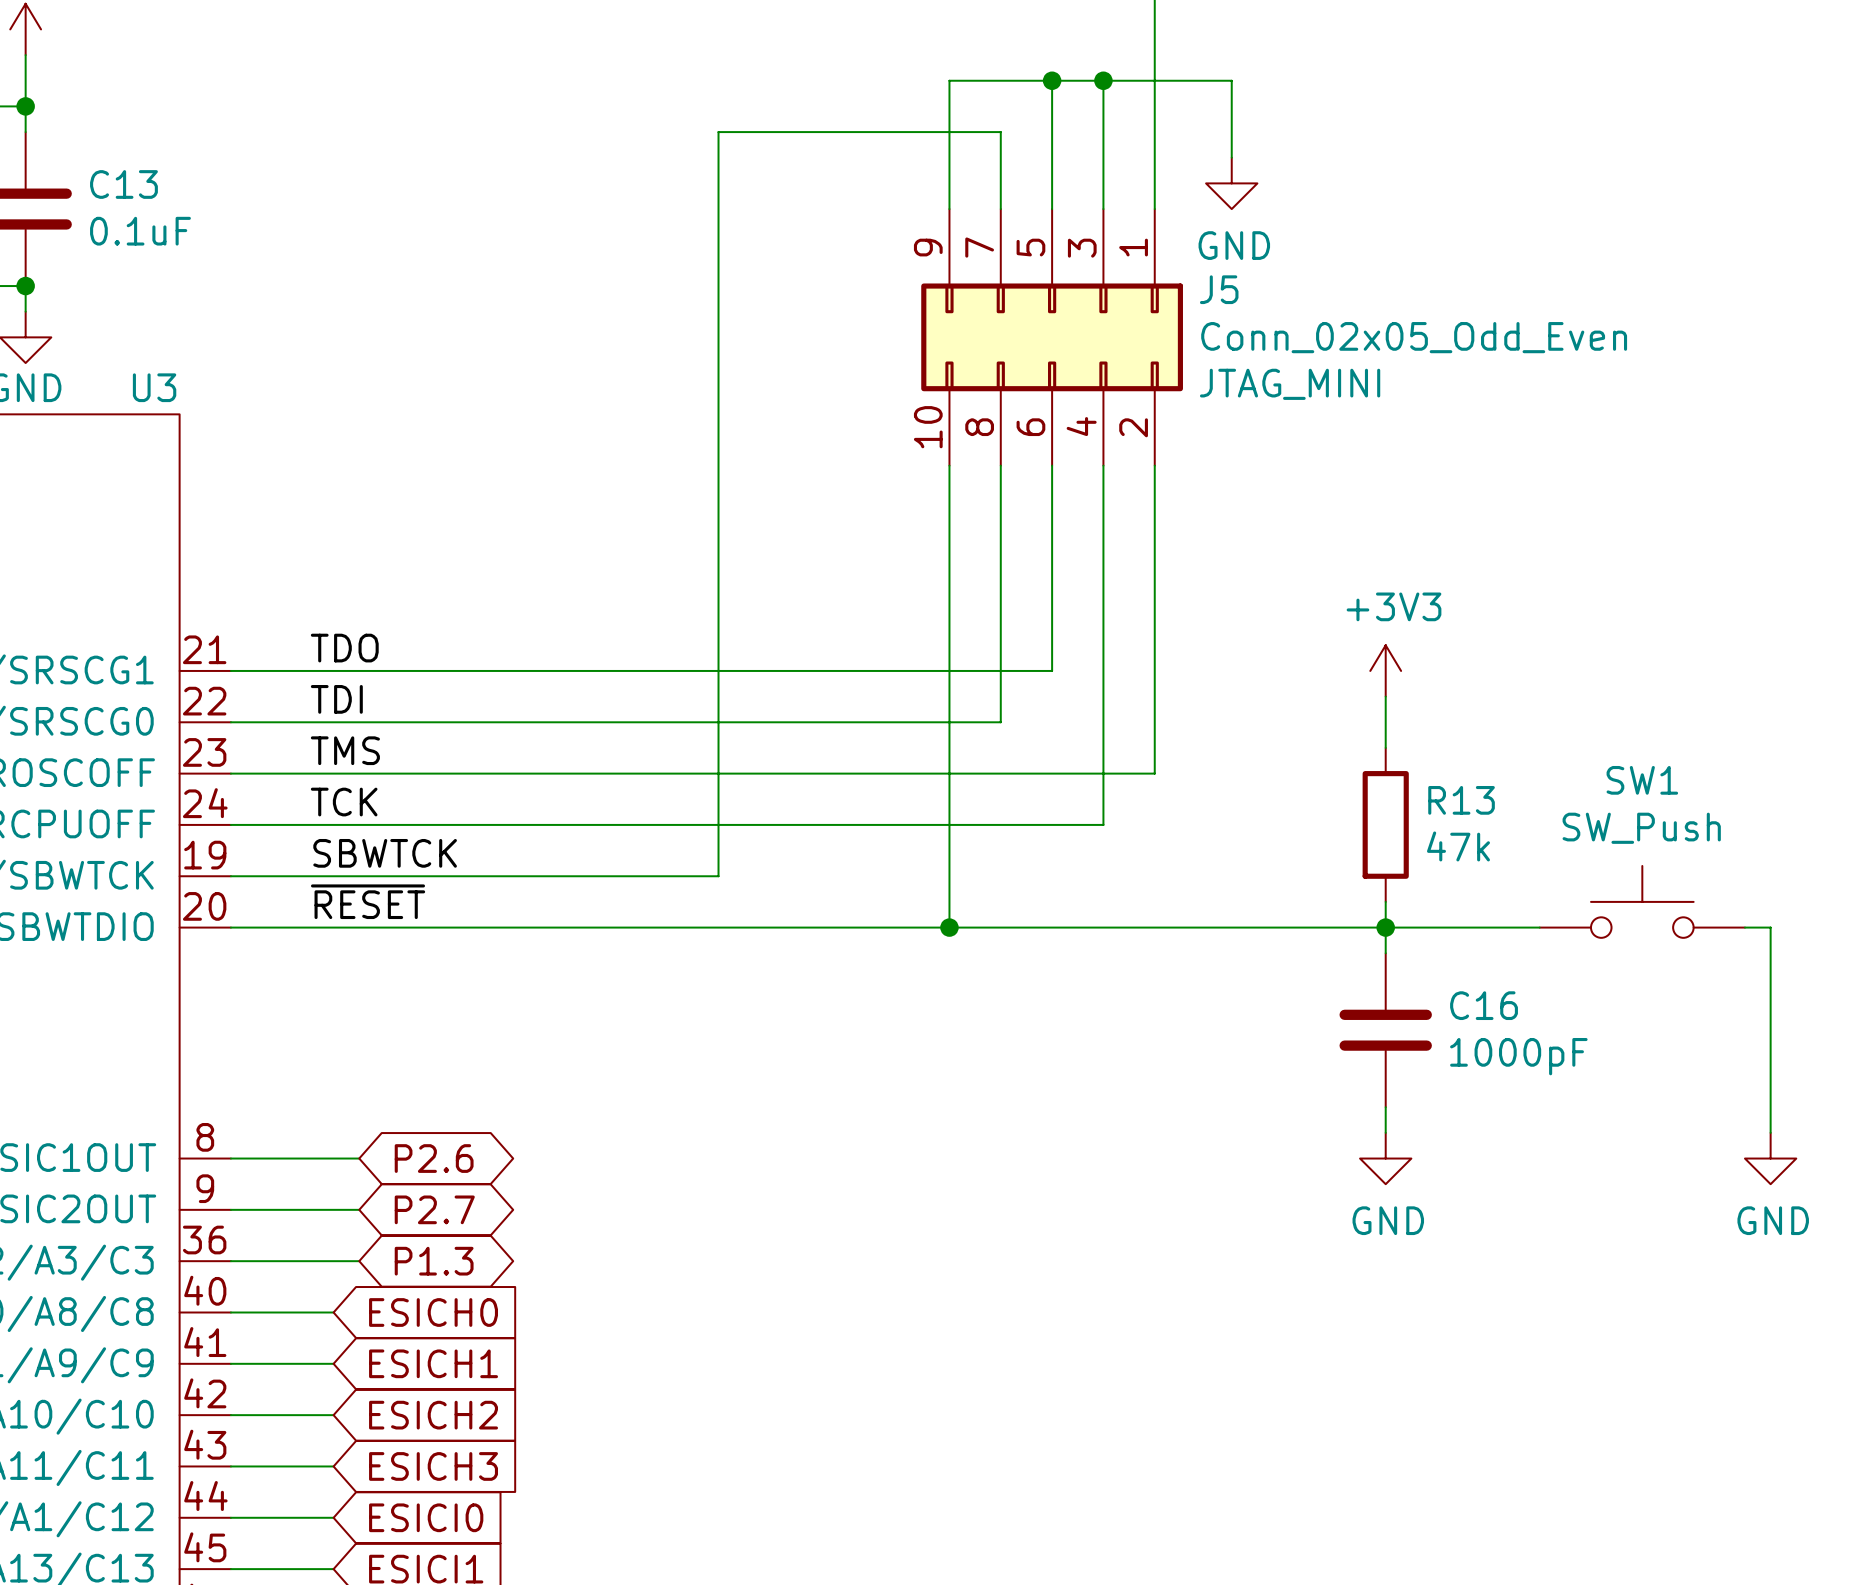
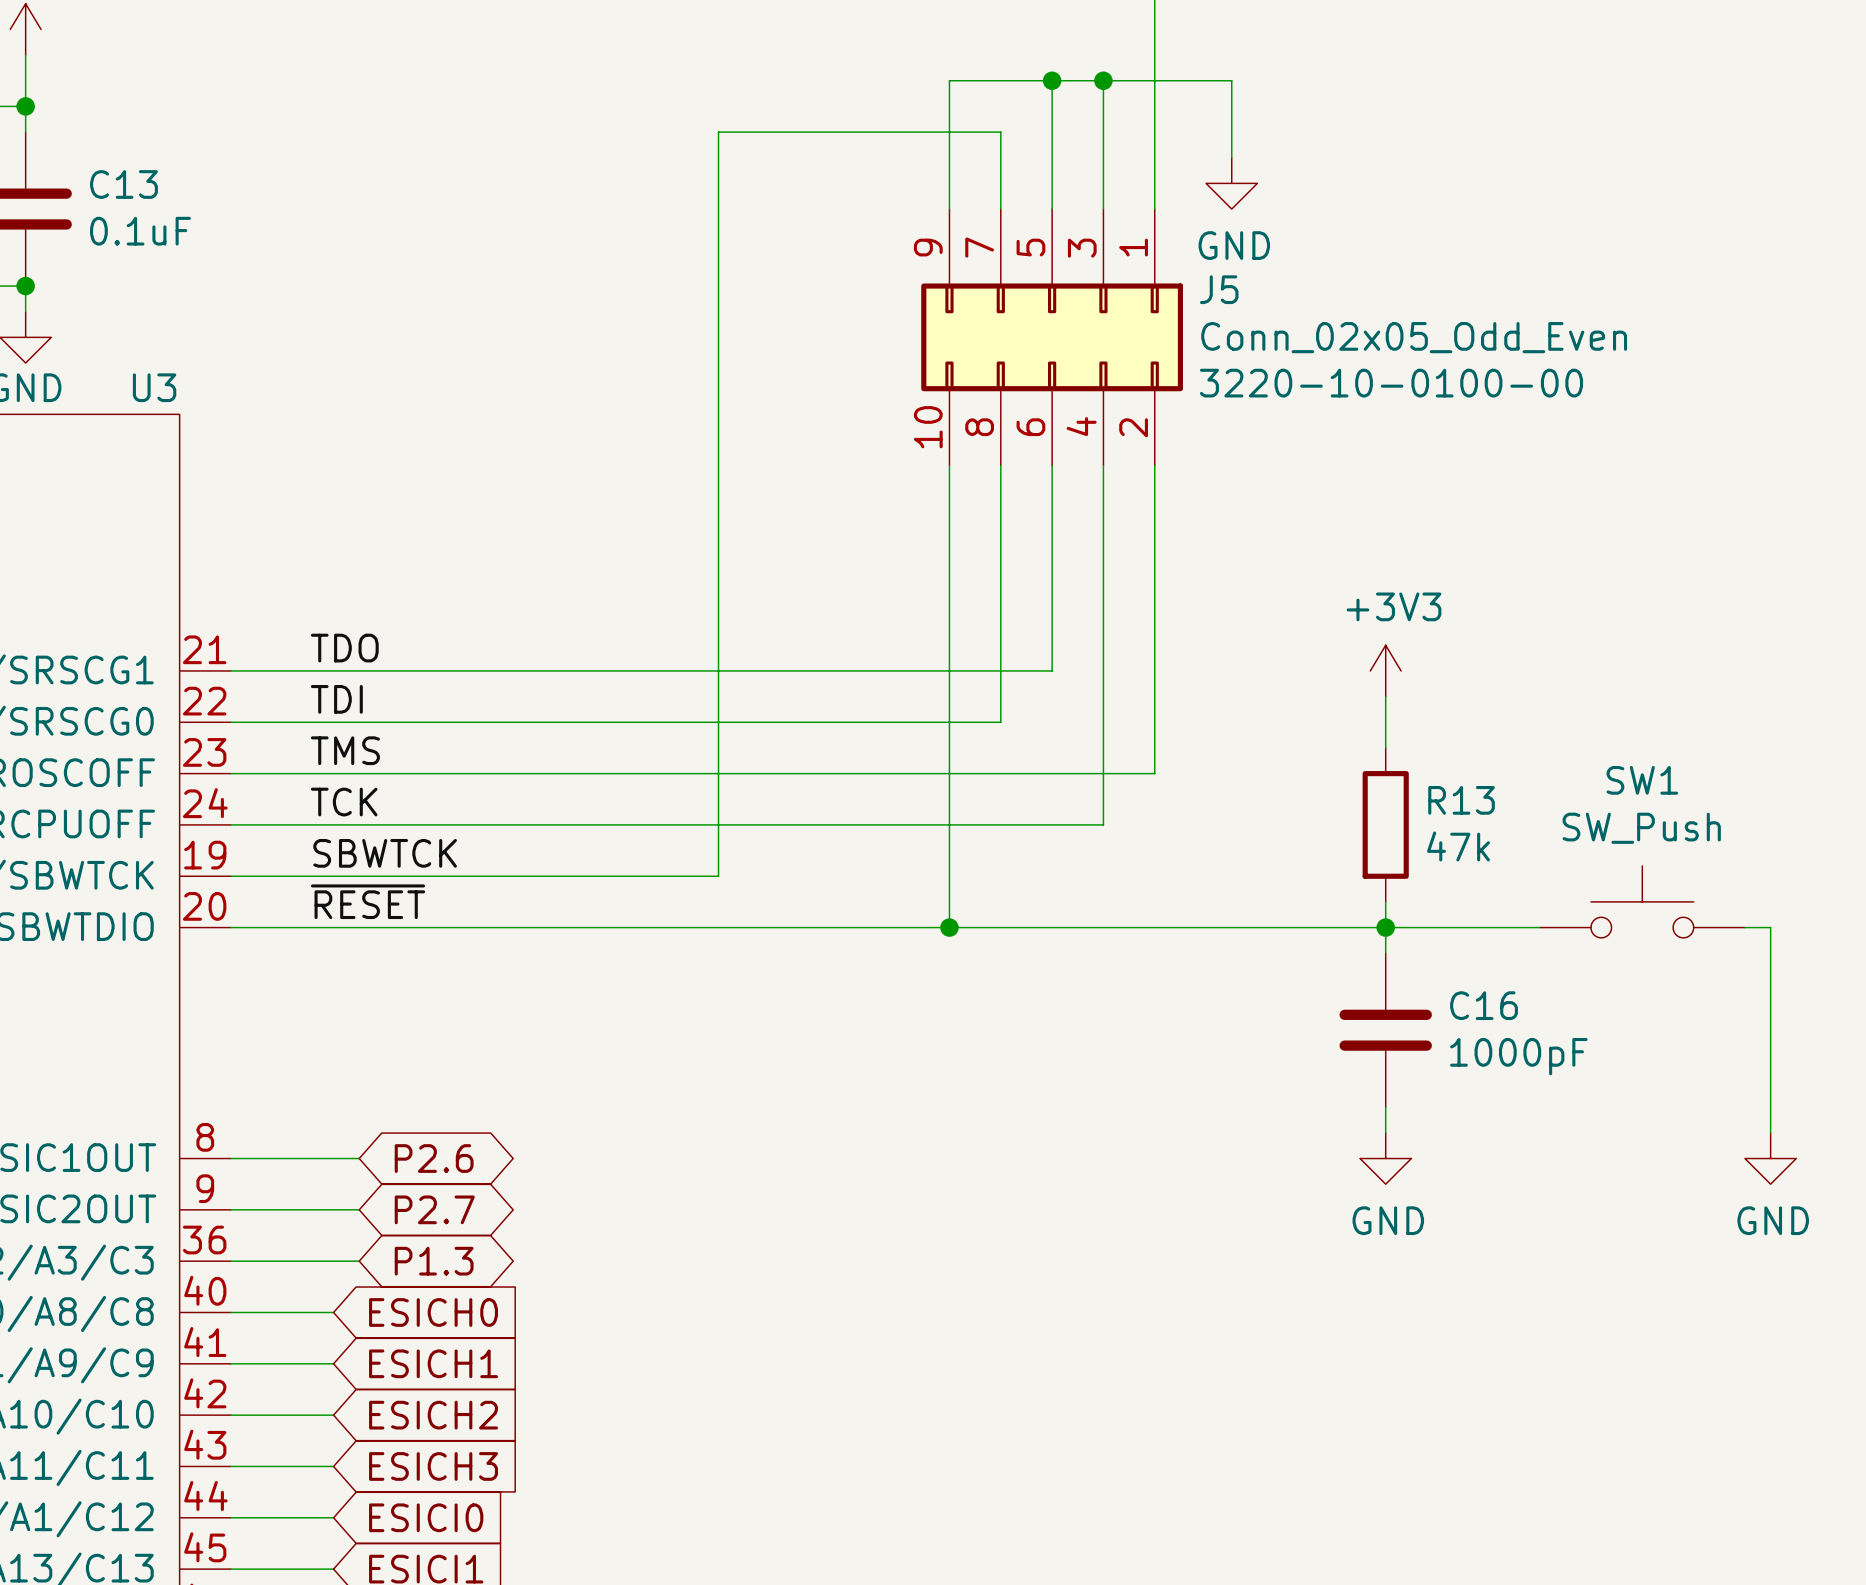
J5 text: none -> 3220-10-0100-00 (1391, 383)
J5 text: JTAG_MINI (1290, 384) -> none

